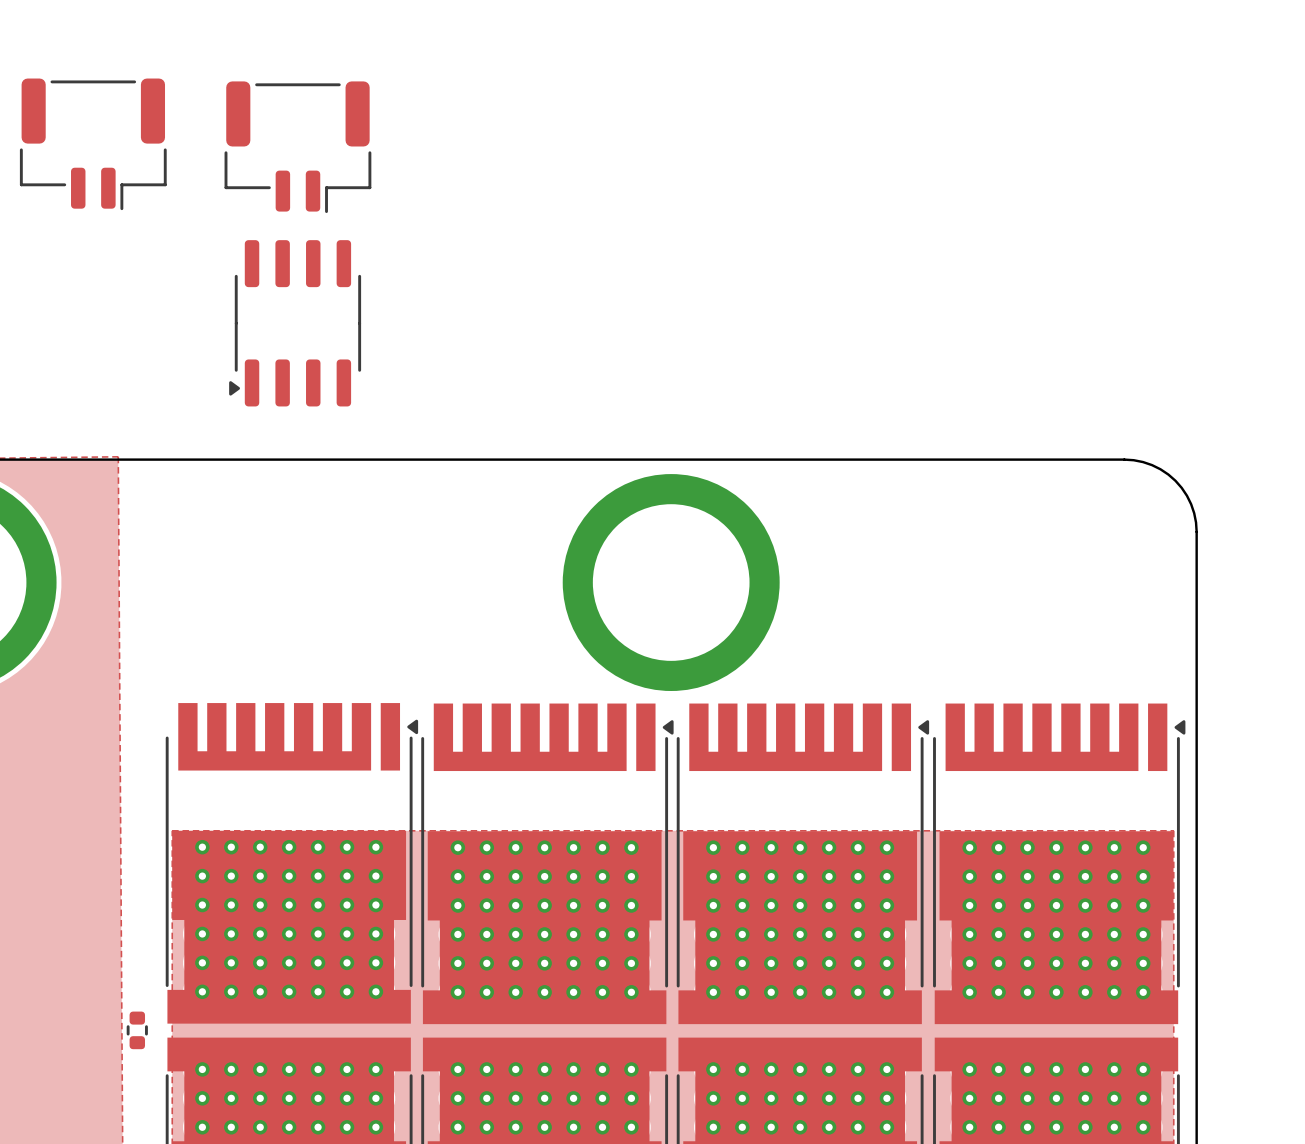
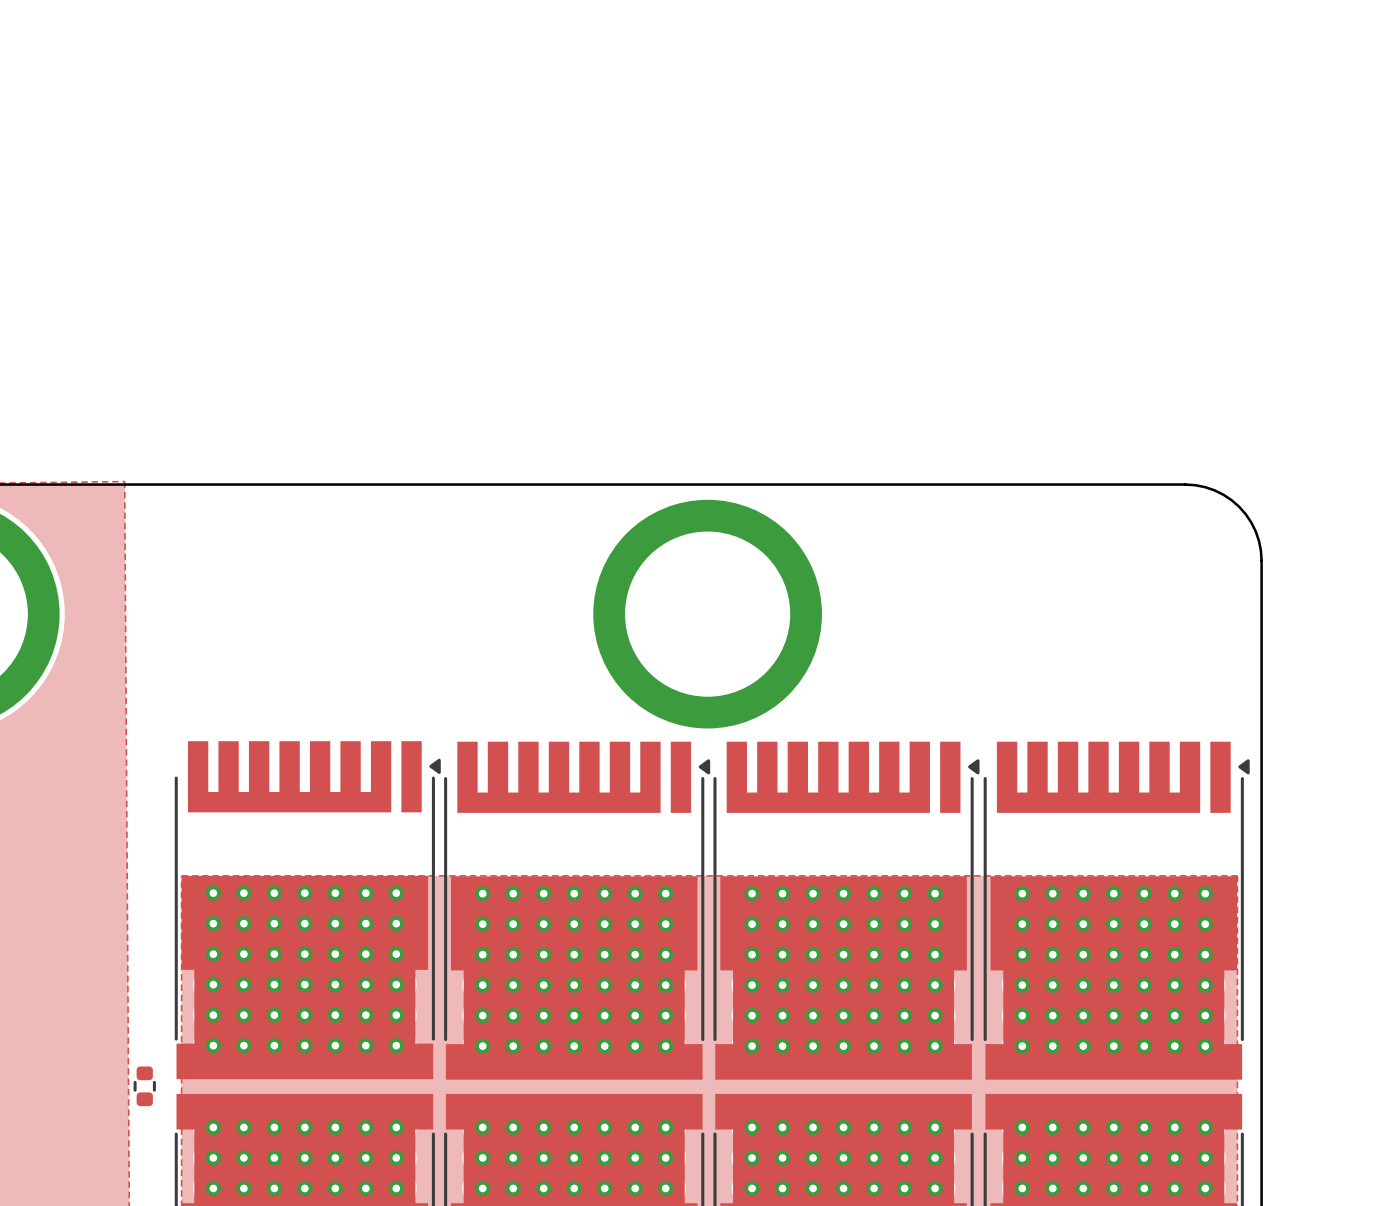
part: (93, 144) -> none
part: (297, 147) -> none
part: (295, 323) -> none

